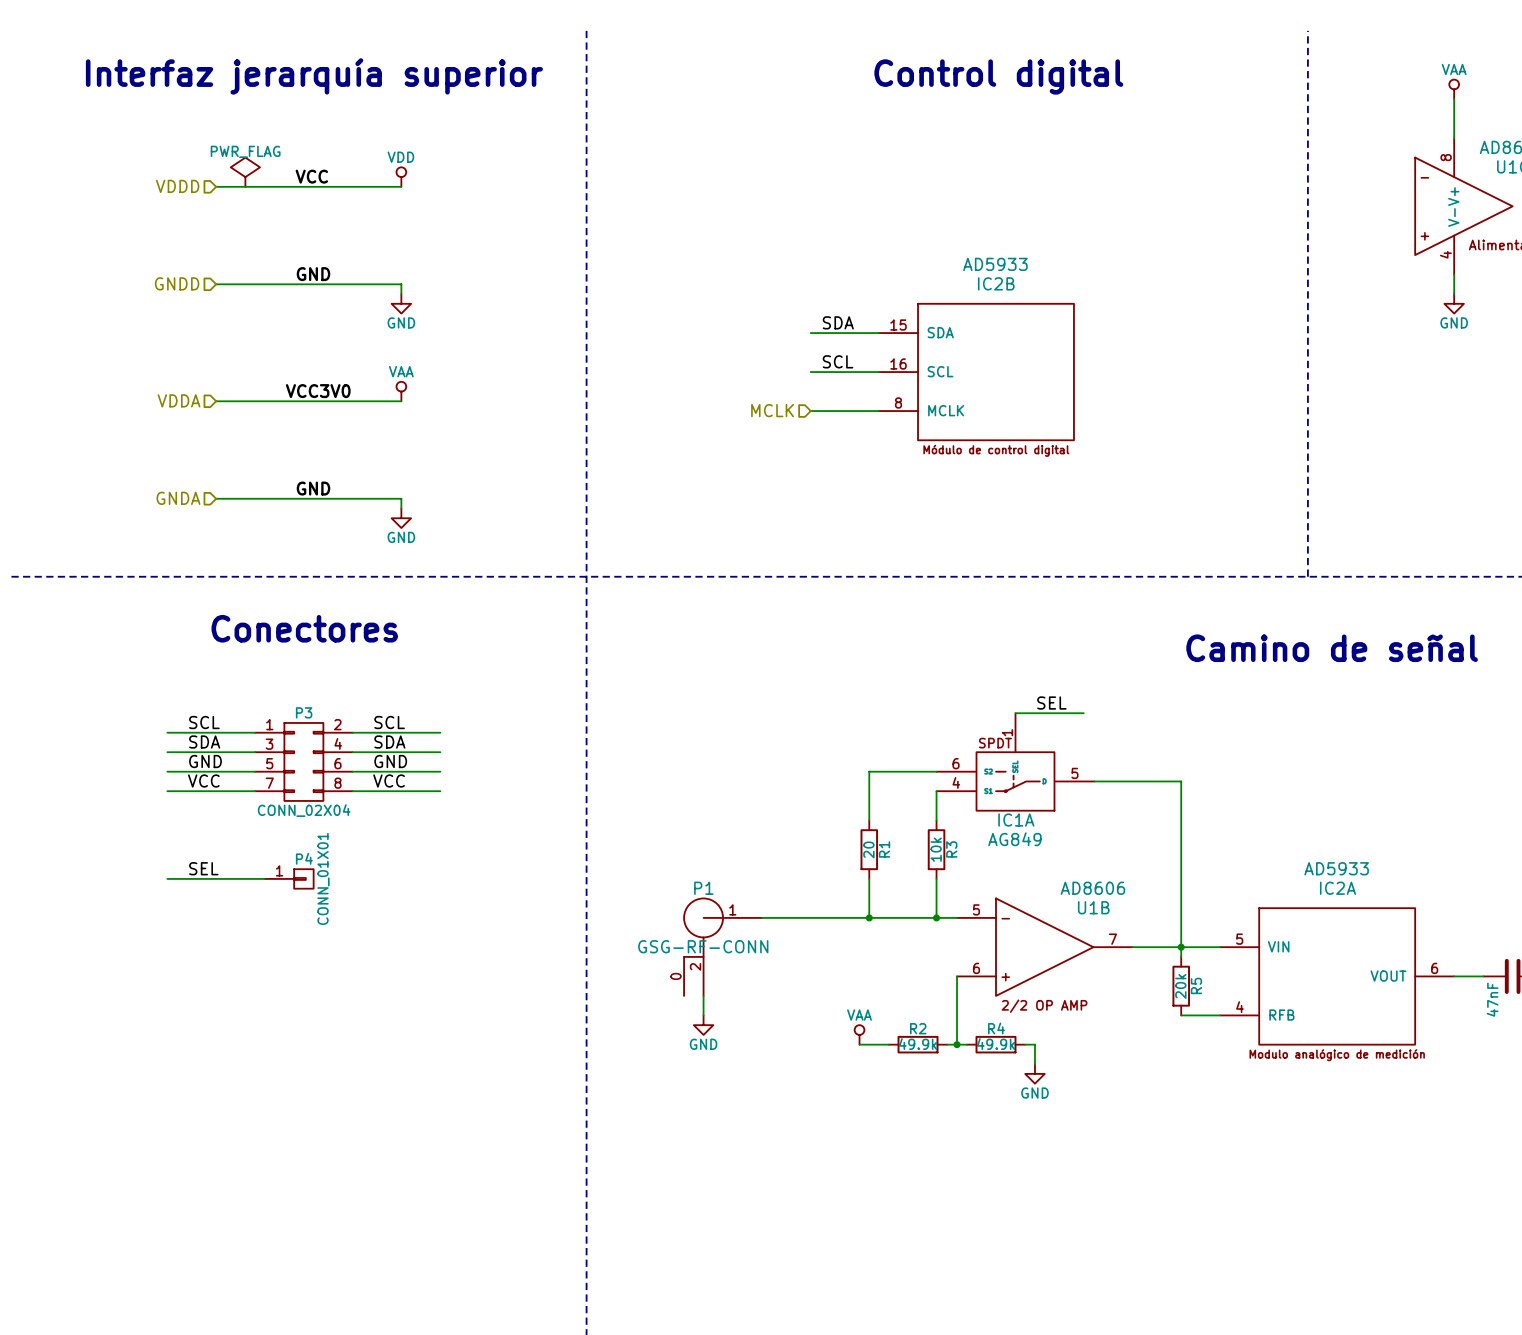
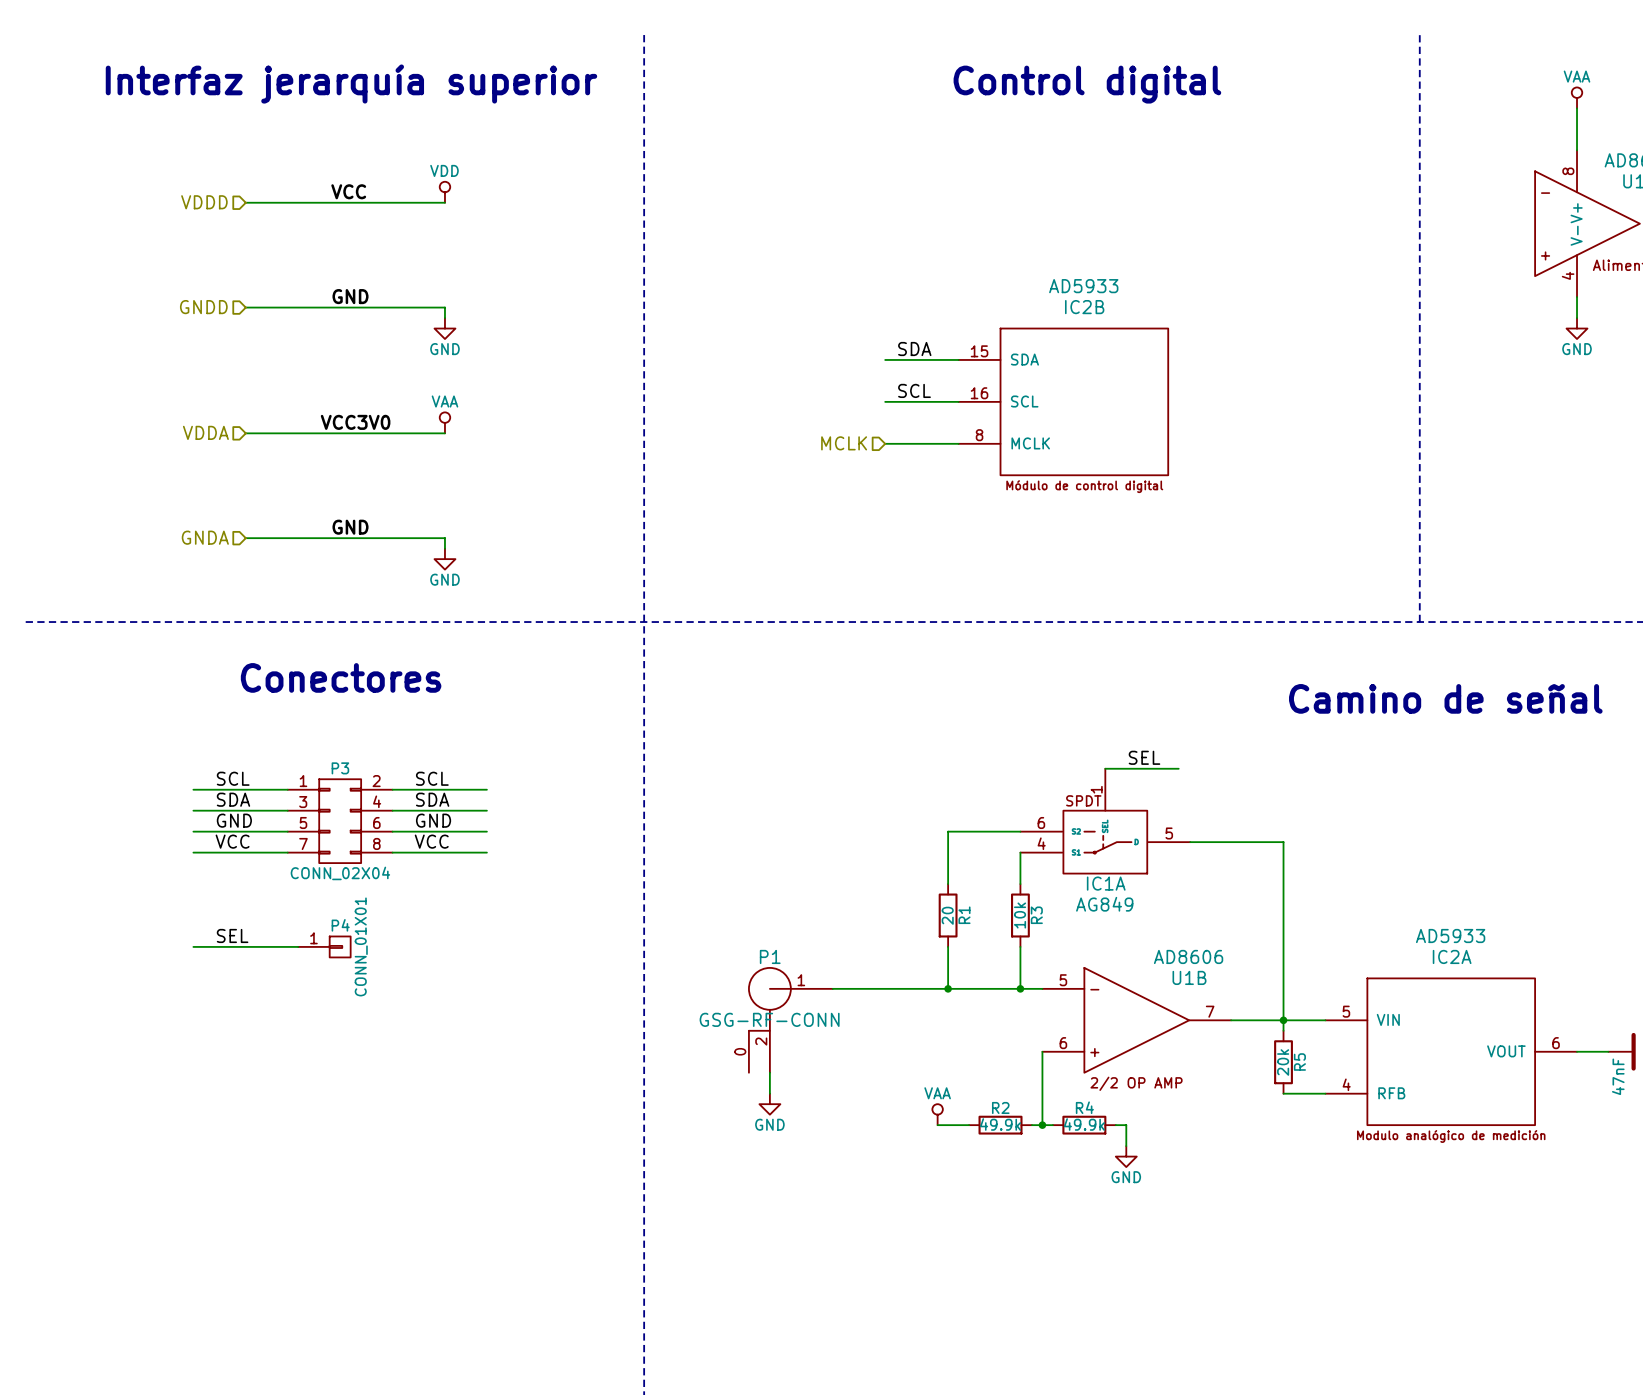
power symbol: PWR_FLAG (245, 172) -> none

